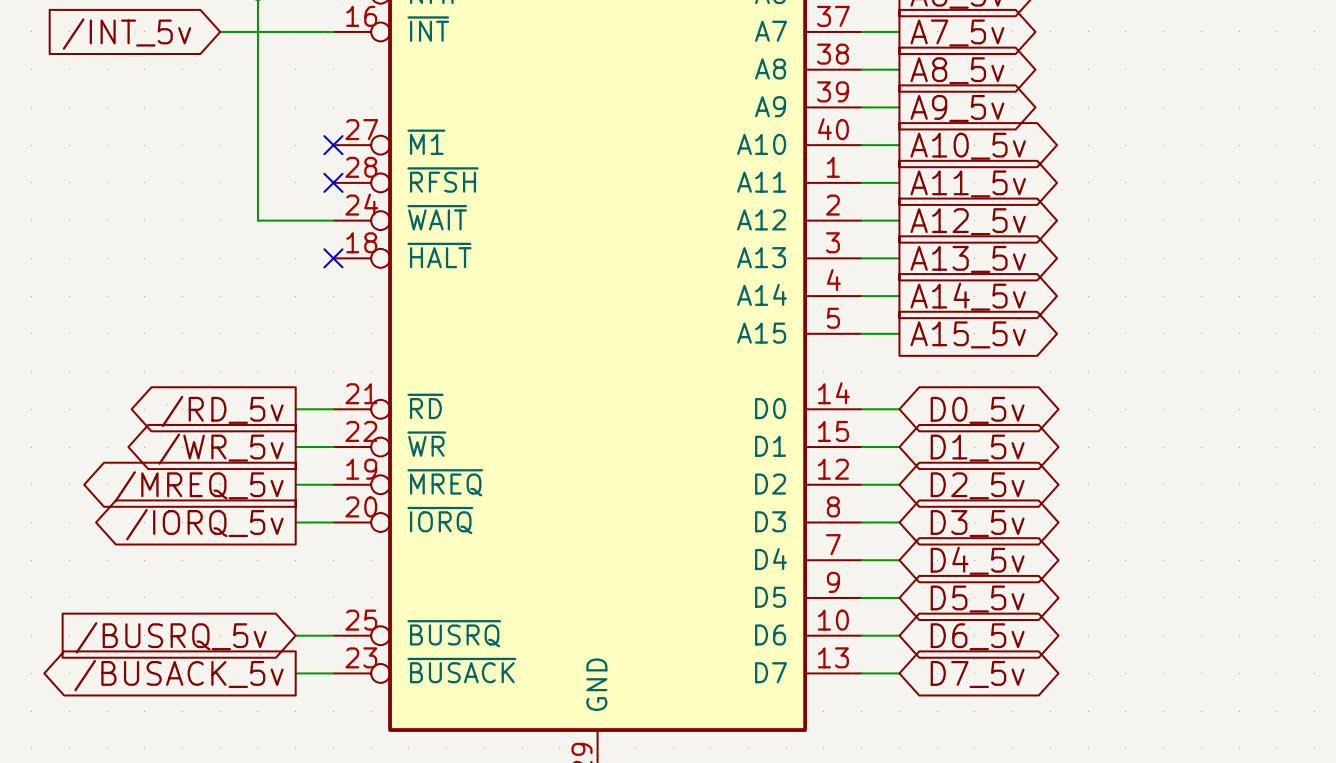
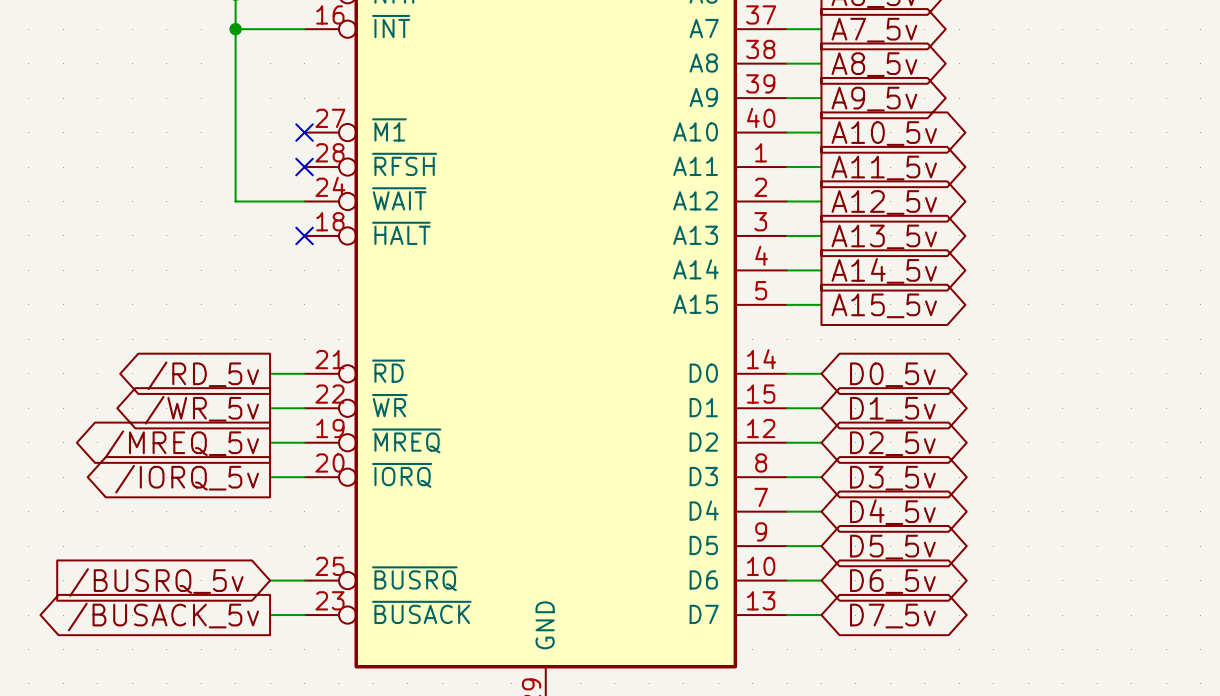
wire: (220, 31) (257, 31) -> none
junction: none -> (235, 29)
global label: /INT_5v (126, 34) -> none

